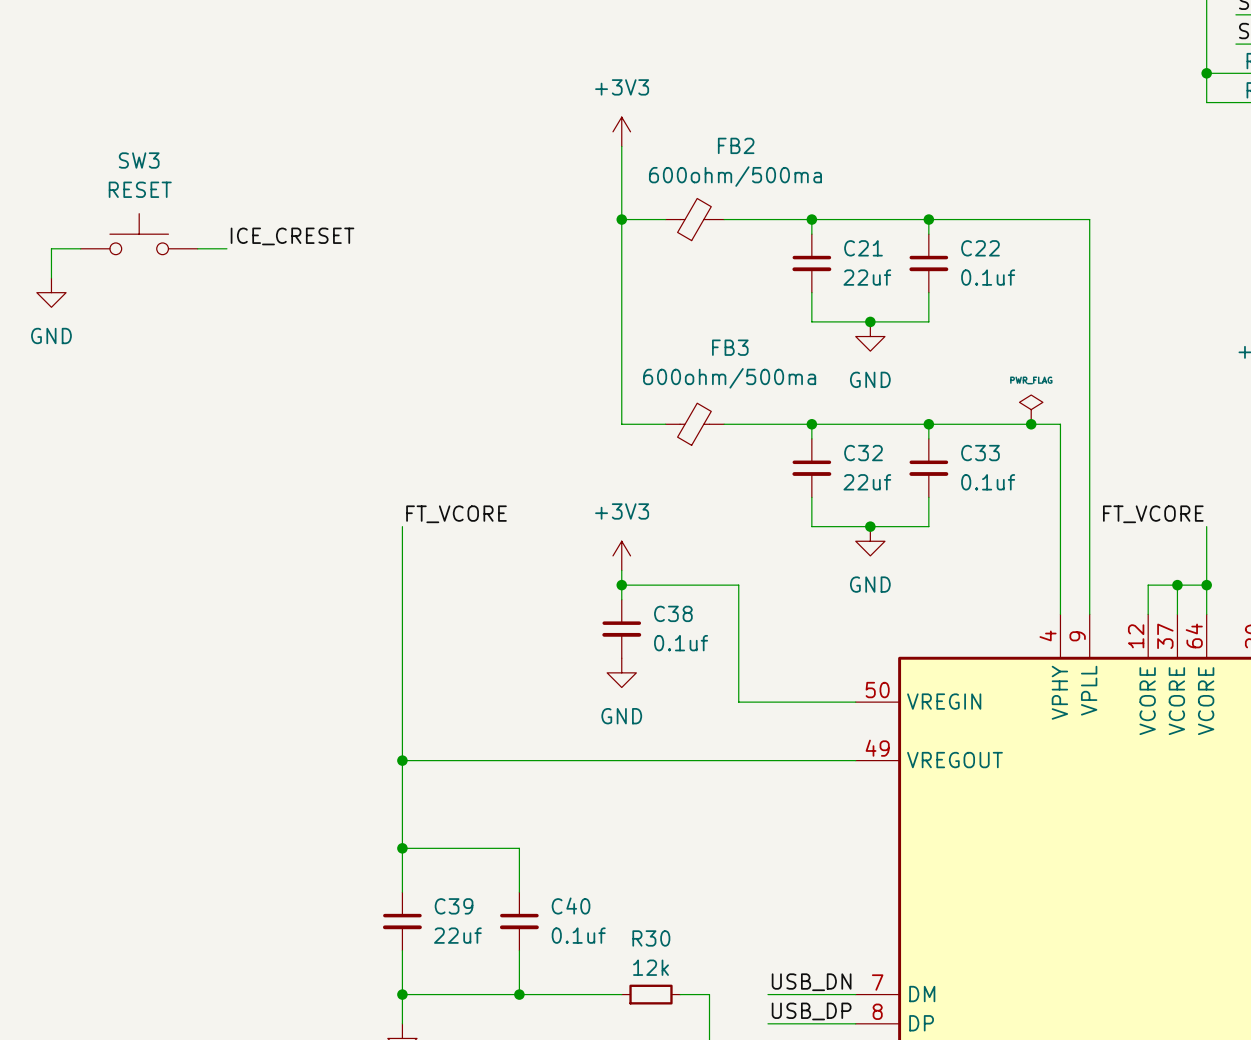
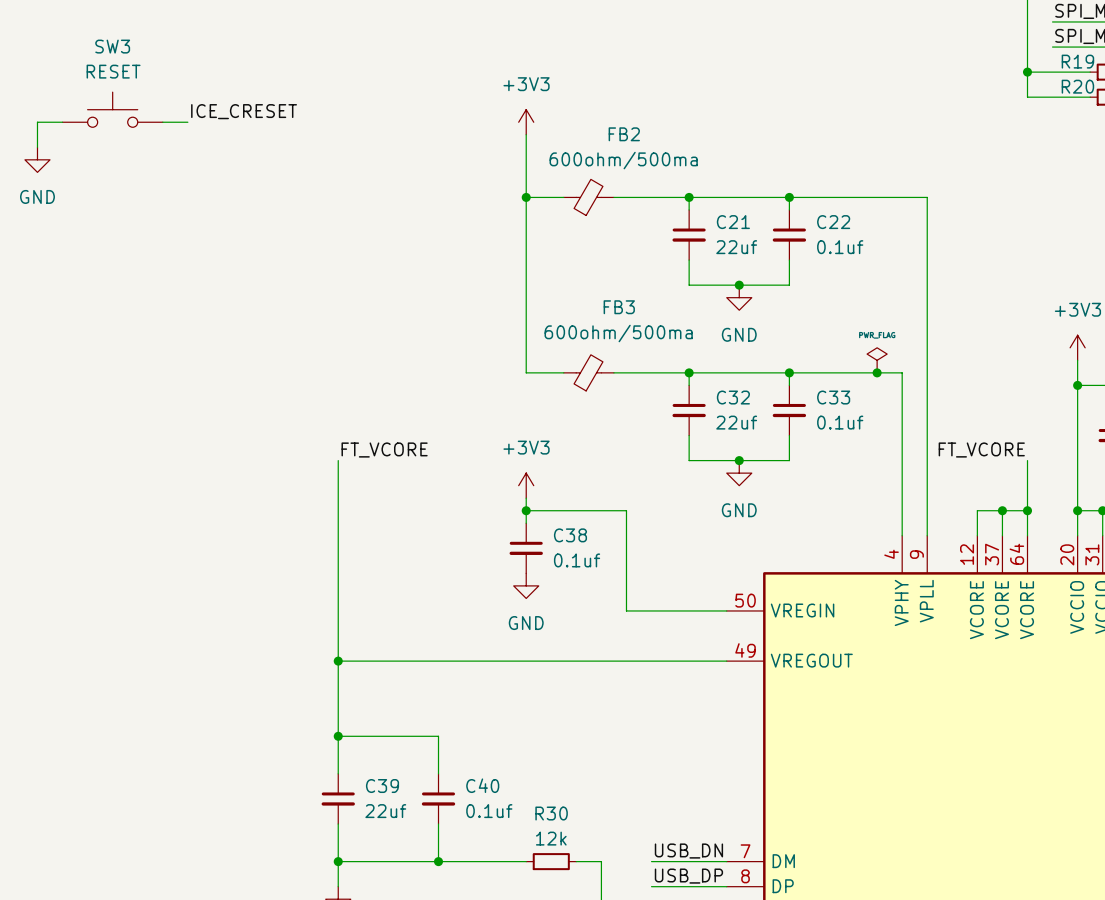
SW3 position: (139, 234) -> (112, 109)
label position: ICE_CRESET (292, 236) -> ICE_CRESET (244, 111)
wire: (80, 248) (51, 248) (51, 278) -> (62, 122) (37, 122) (37, 147)
wire: (197, 248) (226, 248) -> (162, 122) (187, 122)
power symbol position: GND (51, 292) -> GND (37, 159)

